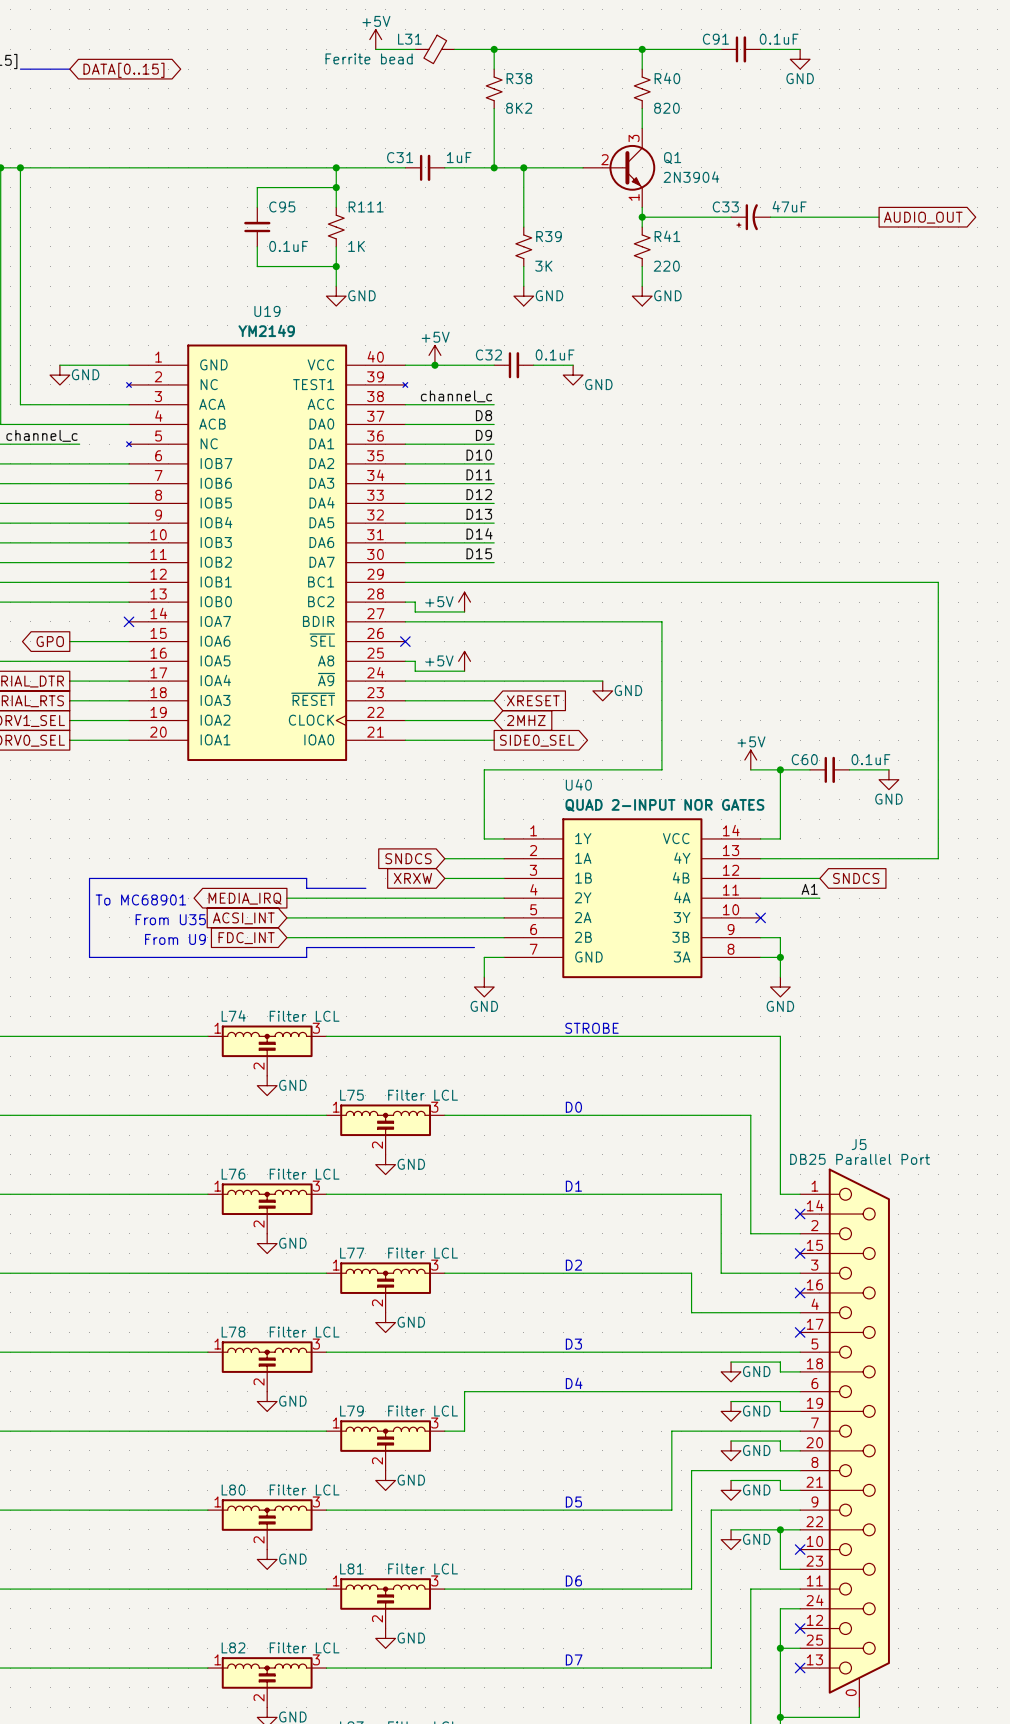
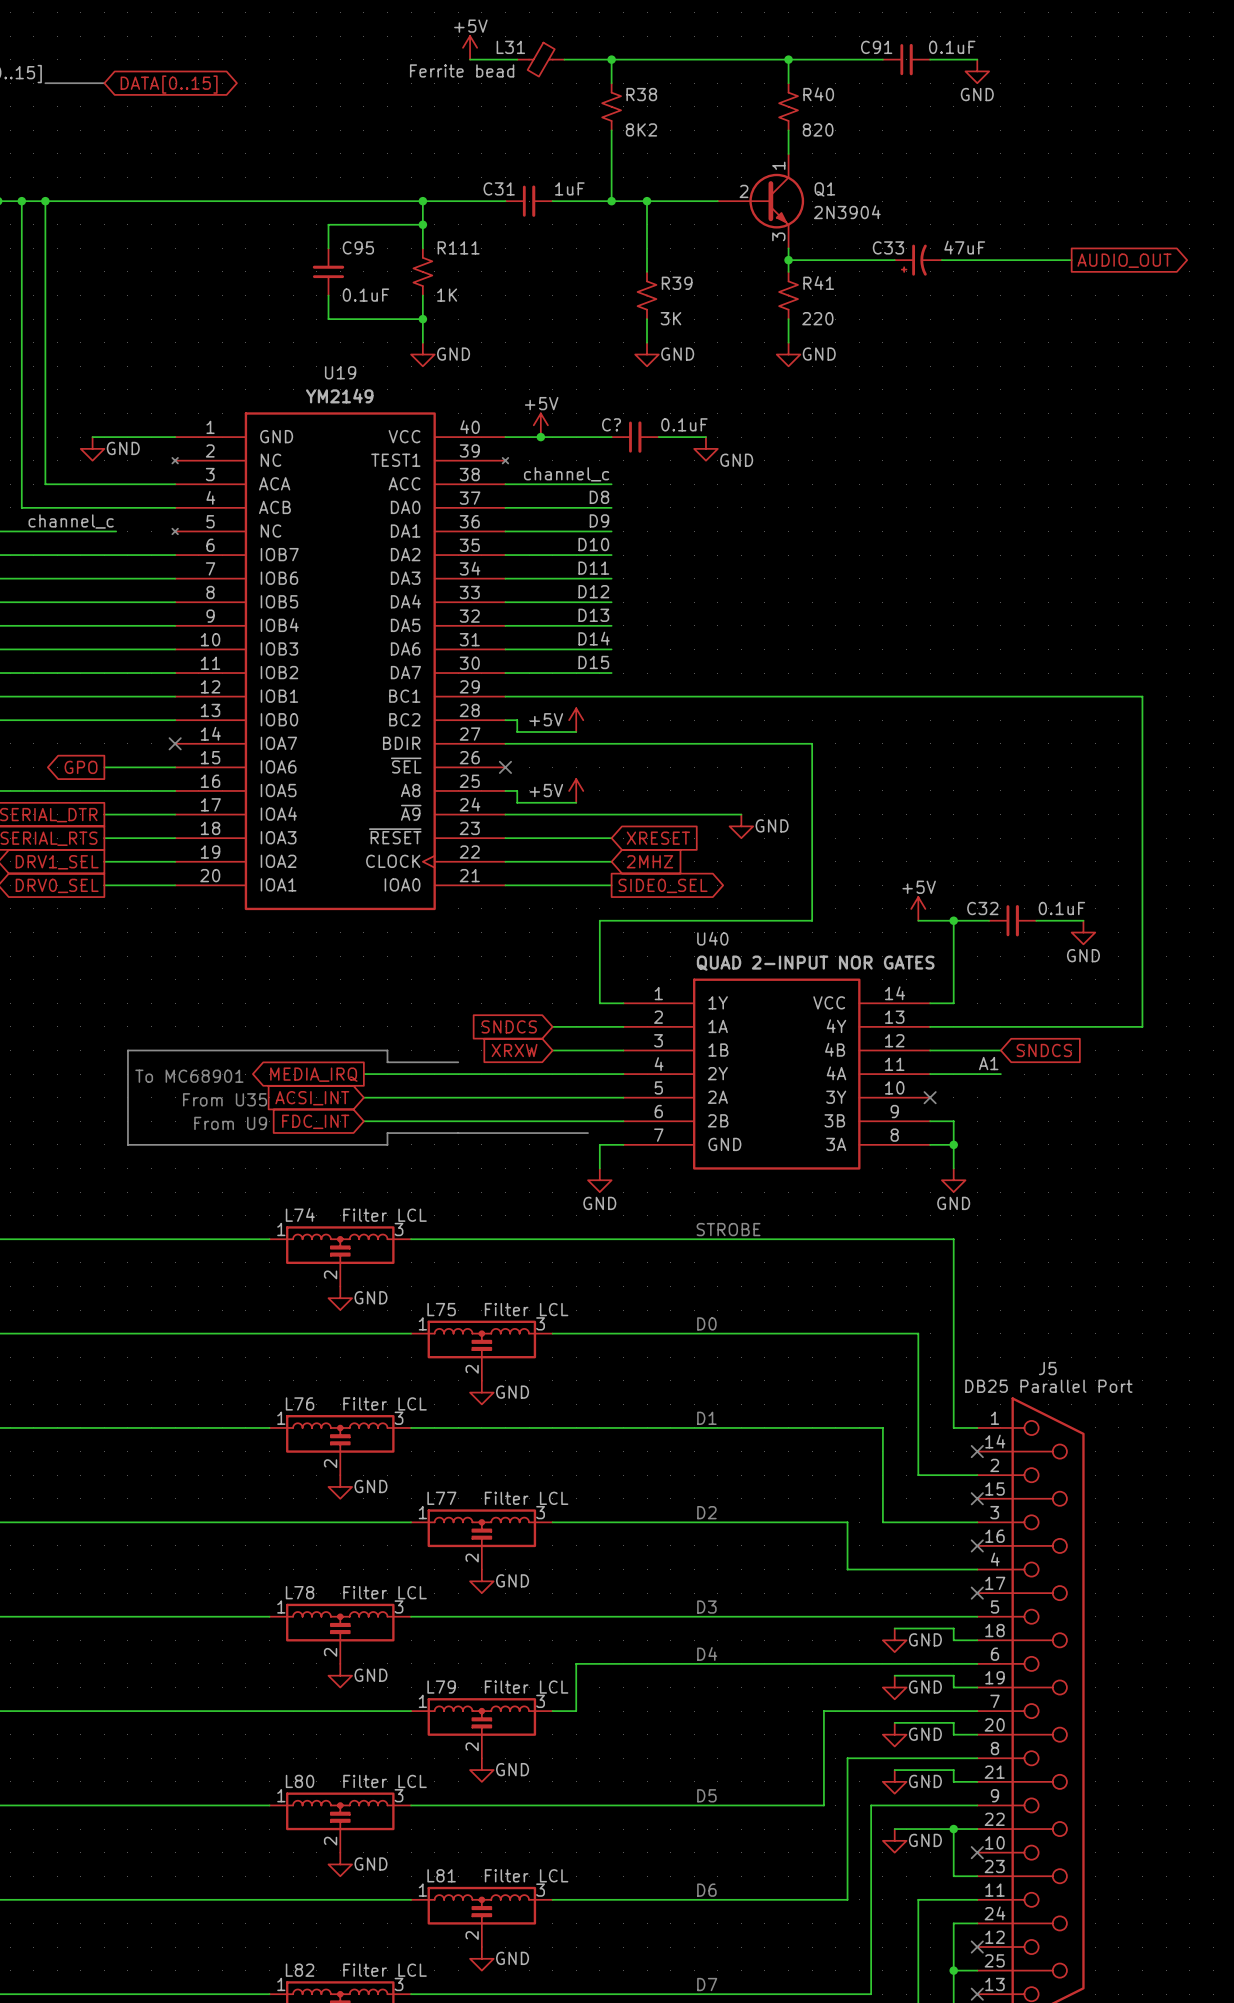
Q1 pin number: 3 (634, 138) -> 1 (778, 165)
Q1 pin number: 1 (634, 197) -> 3 (778, 236)
C32 name: C32 (488, 354) -> C? (611, 424)
C60 name: C60 (804, 759) -> C32 (982, 908)

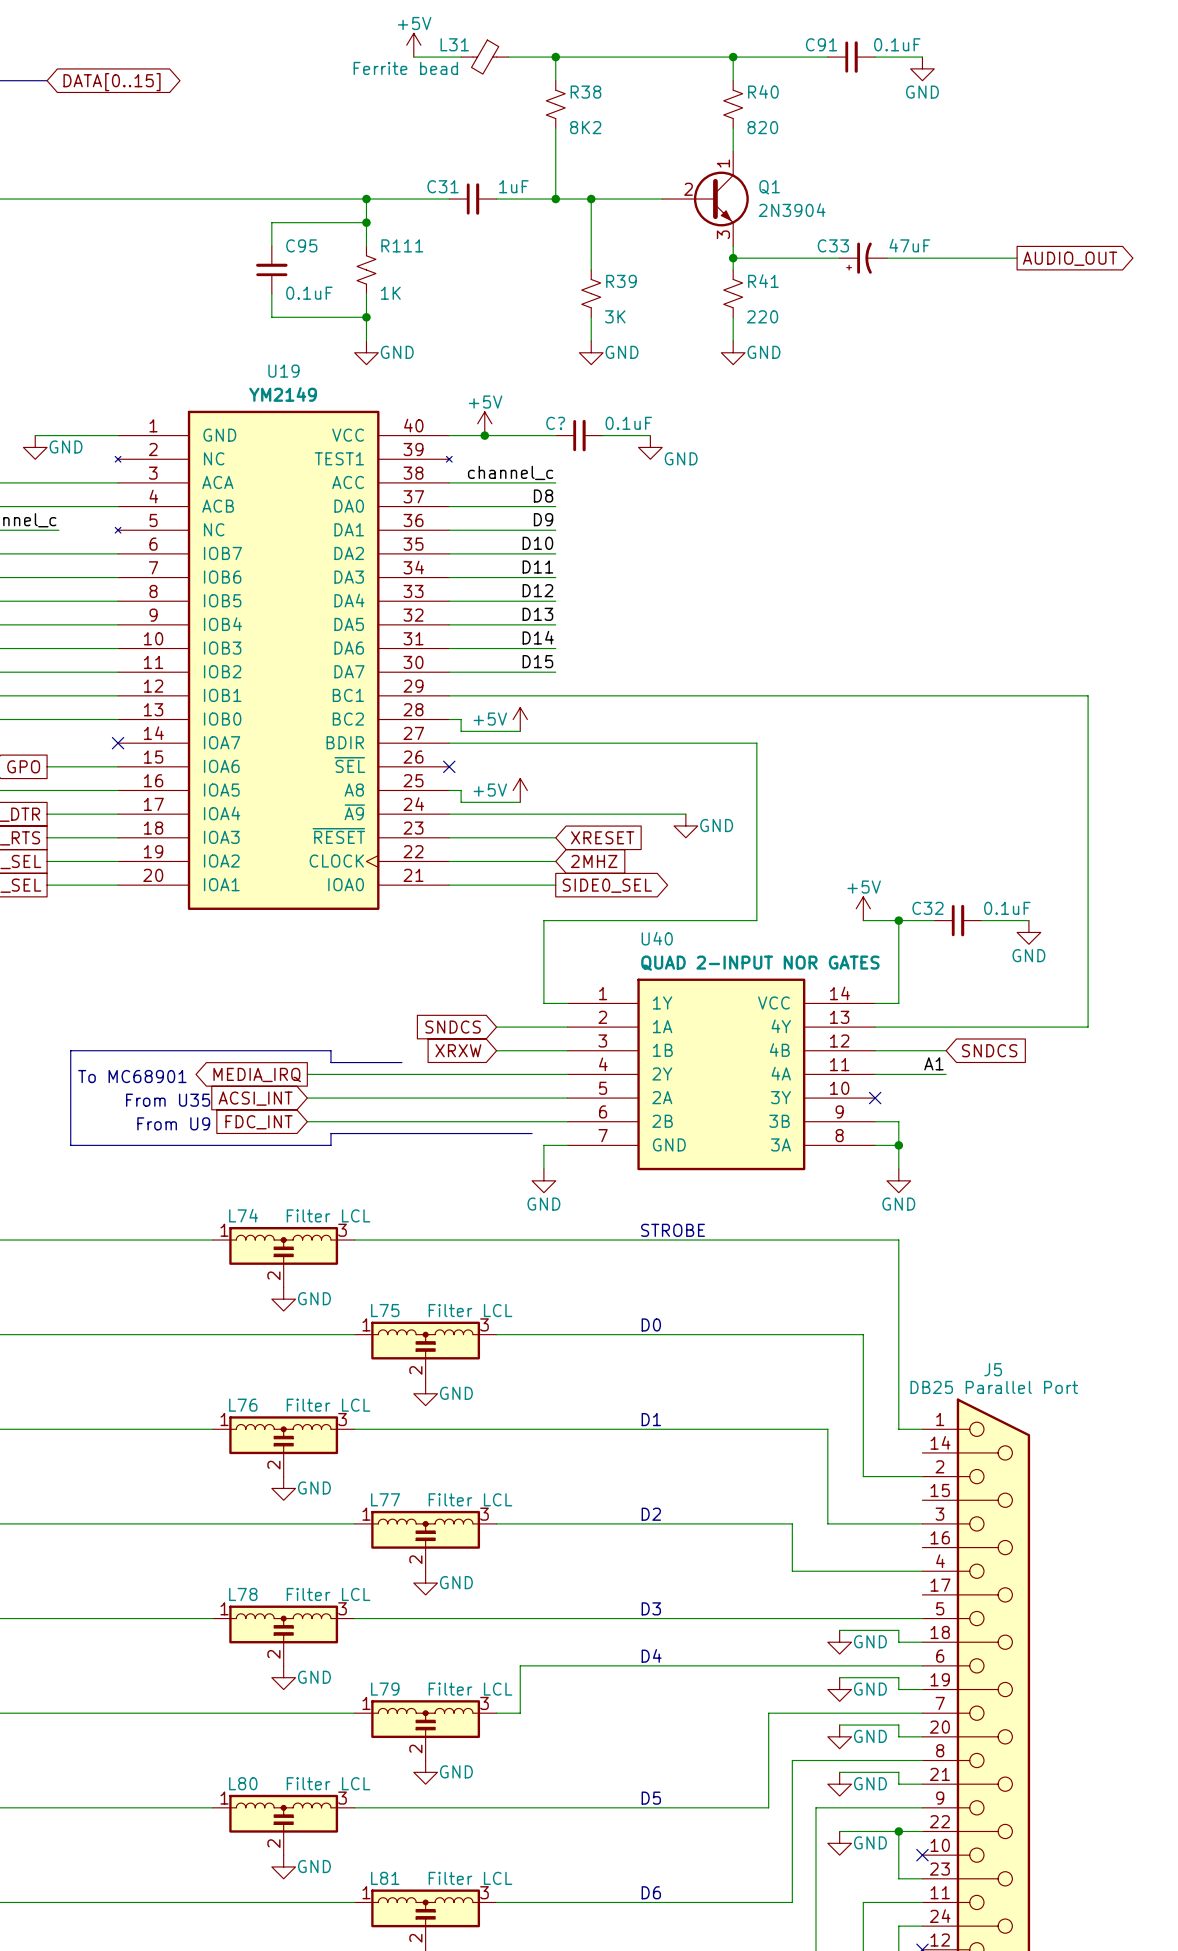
no-connect mark: (977, 1451) -> none
no-connect mark: (977, 1498) -> none
no-connect mark: (977, 1545) -> none
no-connect mark: (977, 1593) -> none

